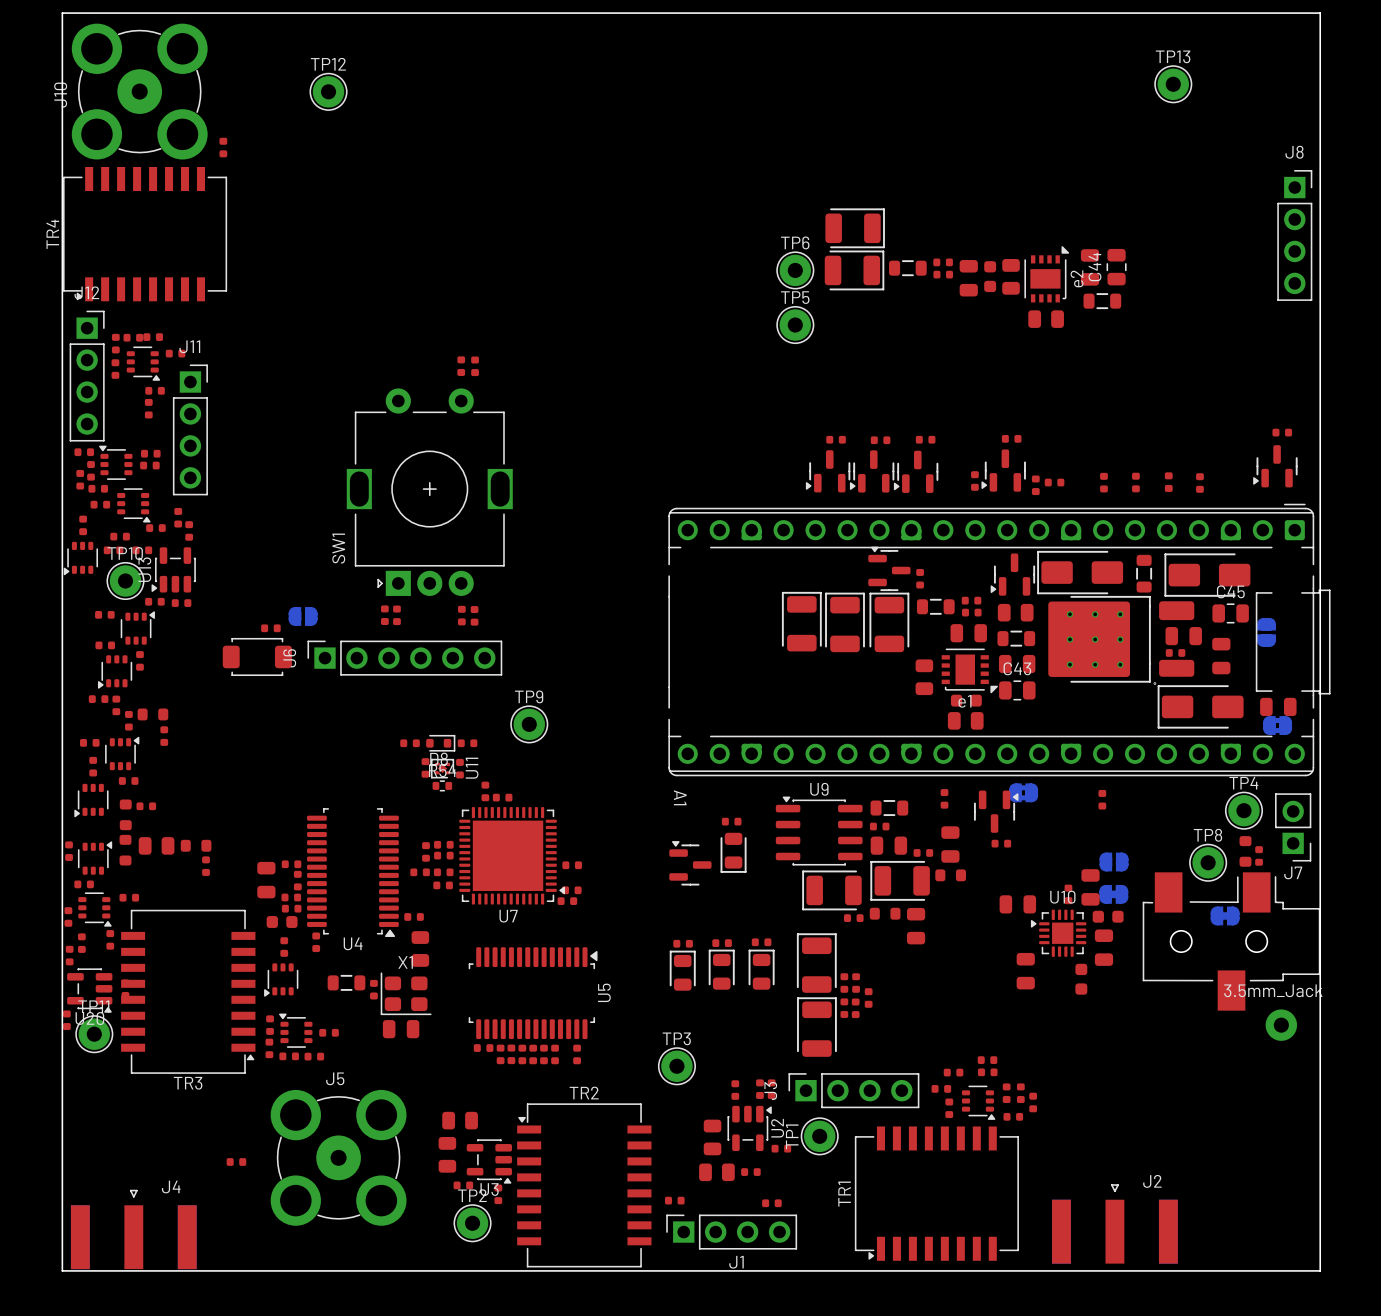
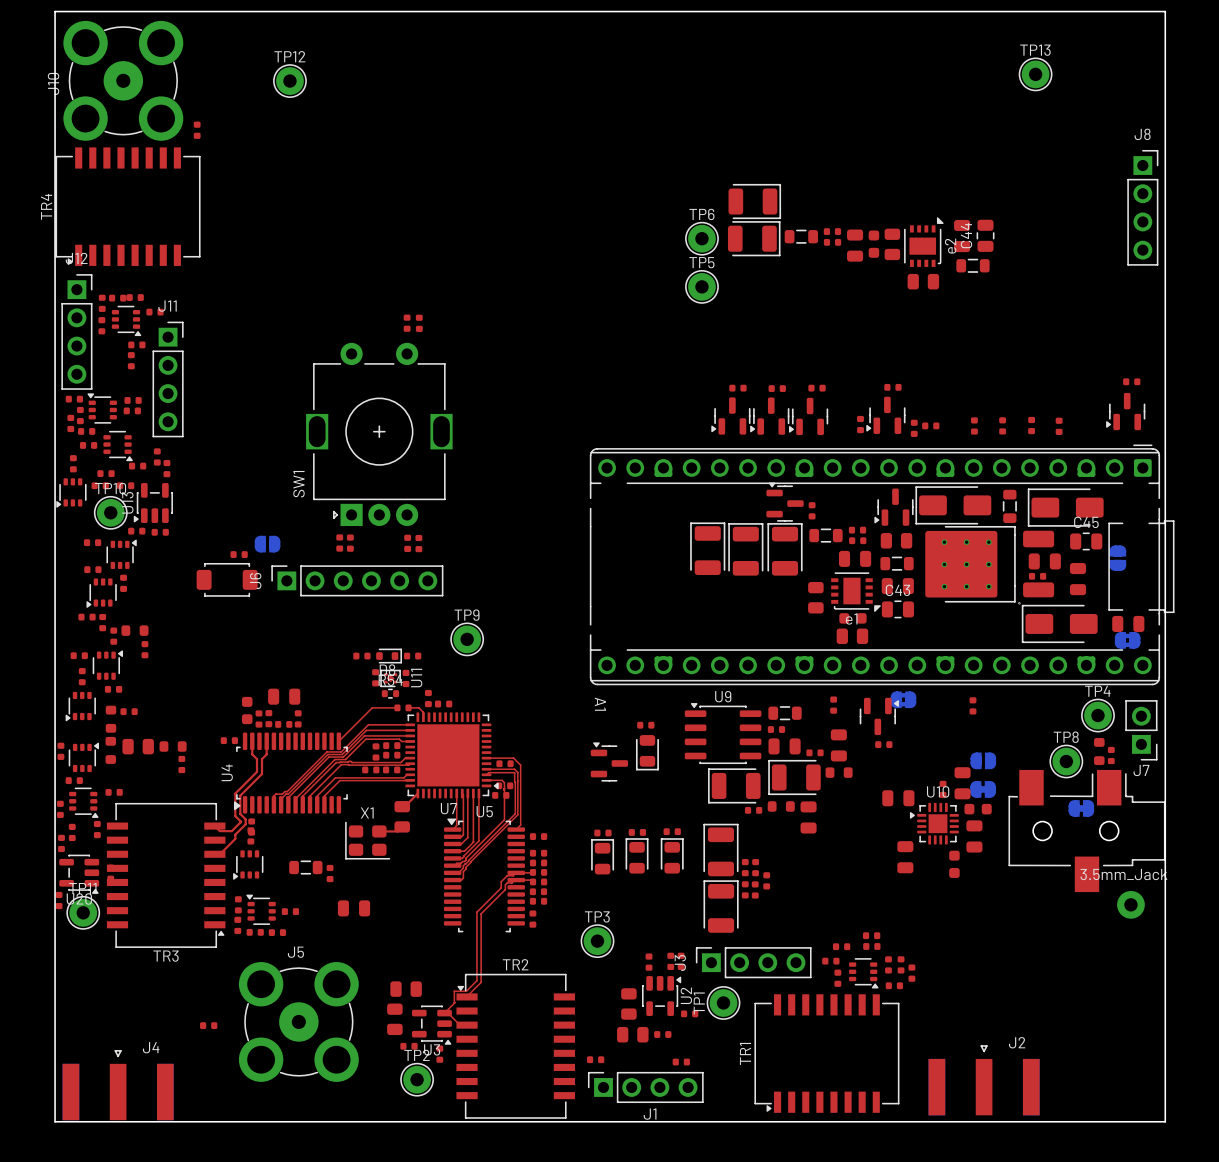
top track: none -> (397, 707) (372, 707) (338, 741)
part: none -> (402, 707)
top track: none -> (408, 707) (418, 707) (423, 712) (423, 717)
part: none -> (258, 718)
part: none -> (268, 718)
part: none -> (298, 718)
part: none -> (283, 724)
top track: none -> (410, 724) (368, 724) (341, 751) (326, 751) (287, 791) (275, 794) (273, 796) (273, 804)
top track: none -> (410, 730) (366, 730) (342, 754) (327, 754) (281, 798) (281, 804)
top track: none -> (410, 735) (364, 735) (343, 757) (328, 757) (288, 797) (288, 804)
part: none -> (229, 740)
top track: none -> (252, 741) (252, 754) (256, 759) (256, 771) (235, 793) (235, 816) (240, 822) (231, 831) (219, 831) (214, 826)
top track: none -> (266, 741) (266, 754) (261, 759) (261, 773) (240, 795) (240, 814) (245, 819) (245, 824) (235, 834) (235, 838) (219, 854) (214, 854)
top track: none -> (410, 741) (401, 741) (399, 739) (365, 739) (345, 759) (334, 759) (295, 798) (295, 804)
top track: none -> (410, 758) (405, 758) (400, 762) (336, 762) (302, 796) (302, 804)
top track: none -> (486, 758) (513, 758) (520, 765) (520, 825) (516, 829)
part: (291, 864) -> none
top track: none -> (410, 763) (348, 764)
top track: none -> (349, 764) (341, 764) (310, 796) (310, 804)
top track: none -> (486, 769) (514, 769) (517, 772) (517, 814) (465, 867) (463, 878) (461, 880) (452, 880)
U4 rotation: 0° (352, 872) -> 90° clockwise (290, 773)
top track: none -> (410, 774) (403, 777) (335, 777) (317, 796) (317, 804)
top track: none -> (486, 774) (488, 772) (514, 772) (515, 813) (458, 872) (452, 872)
part rotation: 0° (266, 880) -> 90° clockwise (284, 696)
part position: (266, 880) -> (284, 696)
part: (297, 880) -> none
top track: none -> (410, 780) (339, 780) (324, 796) (324, 804)
top track: none -> (486, 780) (502, 780) (504, 782) (504, 819) (464, 861) (456, 863)
part: (443, 885) -> none
top track: none -> (504, 788) (503, 789)
part: (291, 897) -> none
top track: none -> (417, 793) (404, 806) (402, 806)
top track: none -> (456, 793) (456, 825) (452, 829)
top track: none -> (462, 793) (463, 834) (461, 836) (452, 836)
top track: none -> (467, 793) (467, 837) (461, 843) (452, 843)
top track: none -> (473, 793) (473, 842) (464, 851) (452, 851)
top track: none -> (478, 793) (478, 840) (462, 858) (452, 858)
part: (291, 908) -> none
part: (414, 916) -> none
part rotation: 0° (282, 922) -> 90° clockwise (247, 710)
part position: (282, 922) -> (247, 710)
part: none -> (251, 827)
top track: none -> (402, 826) (397, 831) (379, 831)
part: (316, 942) -> none
part: none -> (538, 836)
part position: (420, 948) -> (402, 816)
part: none -> (538, 853)
part: none -> (538, 862)
part: none -> (538, 872)
top track: none -> (533, 875) (530, 872) (516, 872) (513, 875) (507, 875) (501, 881) (501, 887) (476, 912) (476, 980) (466, 991) (454, 991) (455, 1002) (444, 1013) (447, 1013) (460, 1025) (467, 1025)
X1 position: (406, 993) -> (367, 840)
U5 rotation: 0° (533, 993) -> 90° counterclockwise (484, 875)
top track: none -> (533, 881) (531, 880) (514, 880) (512, 882) (507, 882) (505, 889) (481, 913) (481, 982) (467, 996)
part: none -> (538, 881)
part: none -> (538, 891)
part: none -> (538, 901)
part: none -> (532, 919)
part: (483, 1048) -> none
part: (500, 1054) -> none
part: (511, 1054) -> none
part: (522, 1054) -> none
part: (533, 1054) -> none
part: (543, 1054) -> none
part: (555, 1054) -> none
part: (577, 1054) -> none

